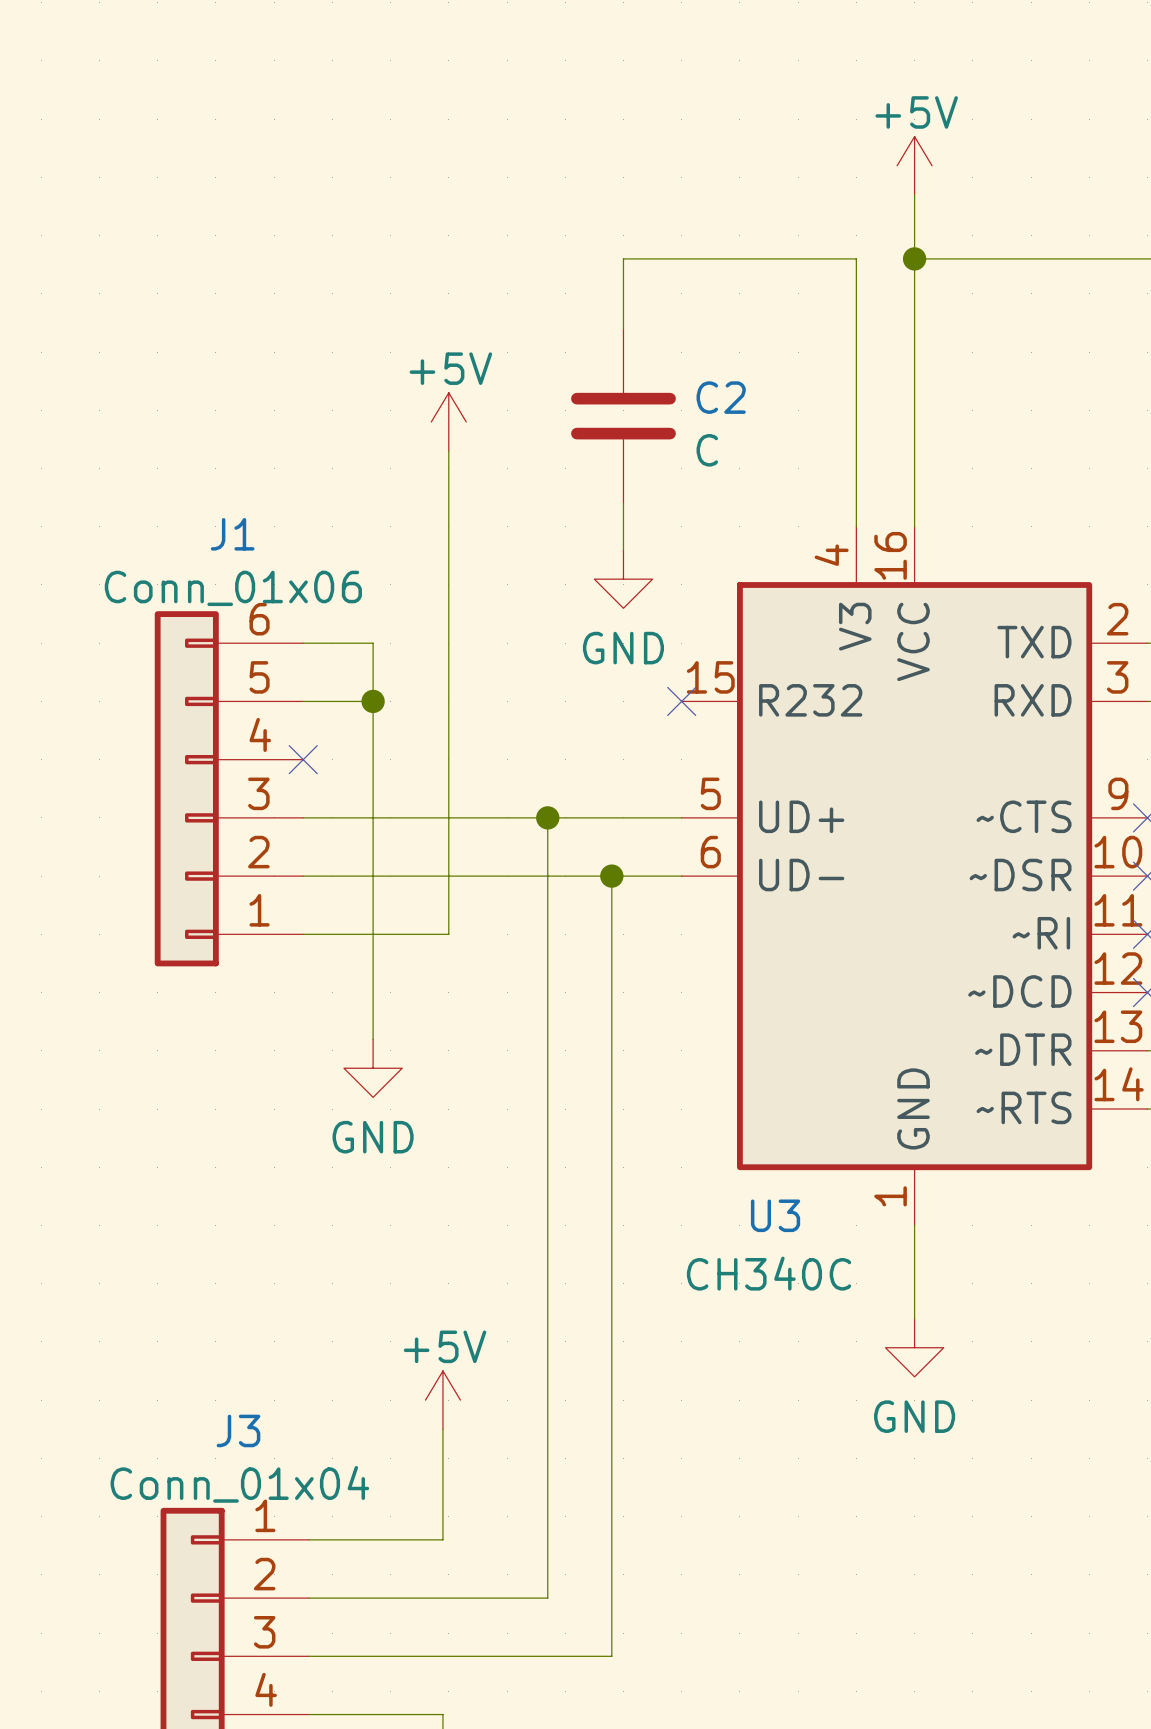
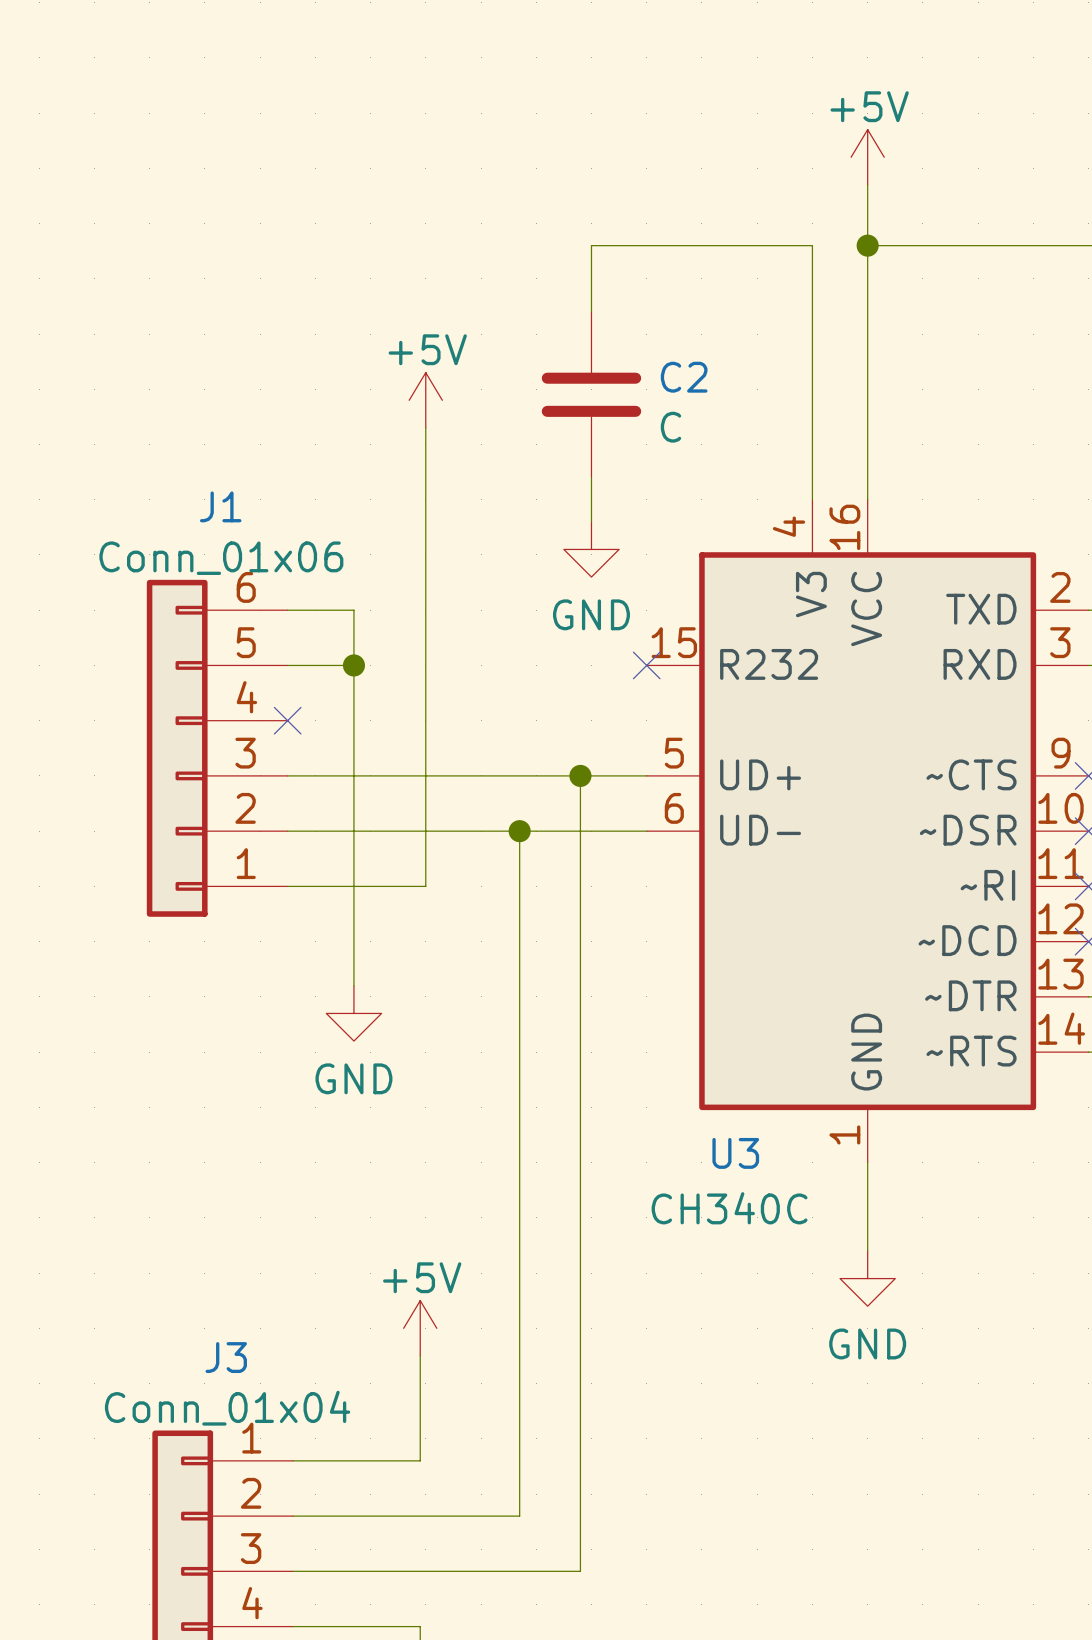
wire: (547, 817) (547, 876) -> (580, 775) (580, 831)
junction: (547, 817) -> none
junction: none -> (580, 775)
junction: none -> (519, 831)
junction: (611, 876) -> none

